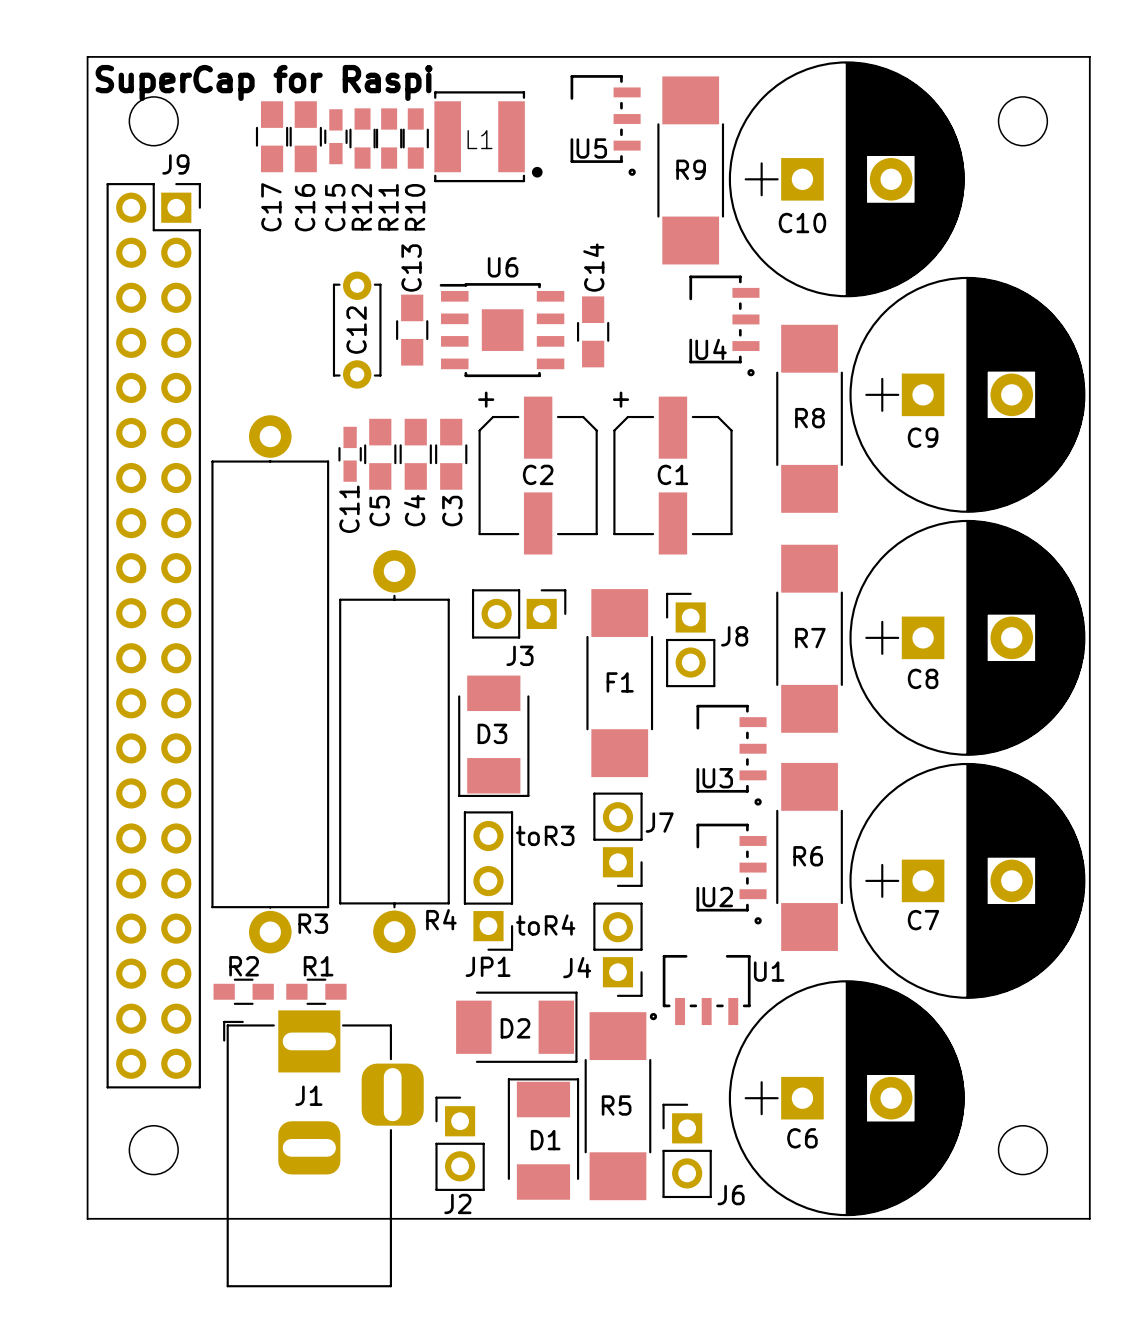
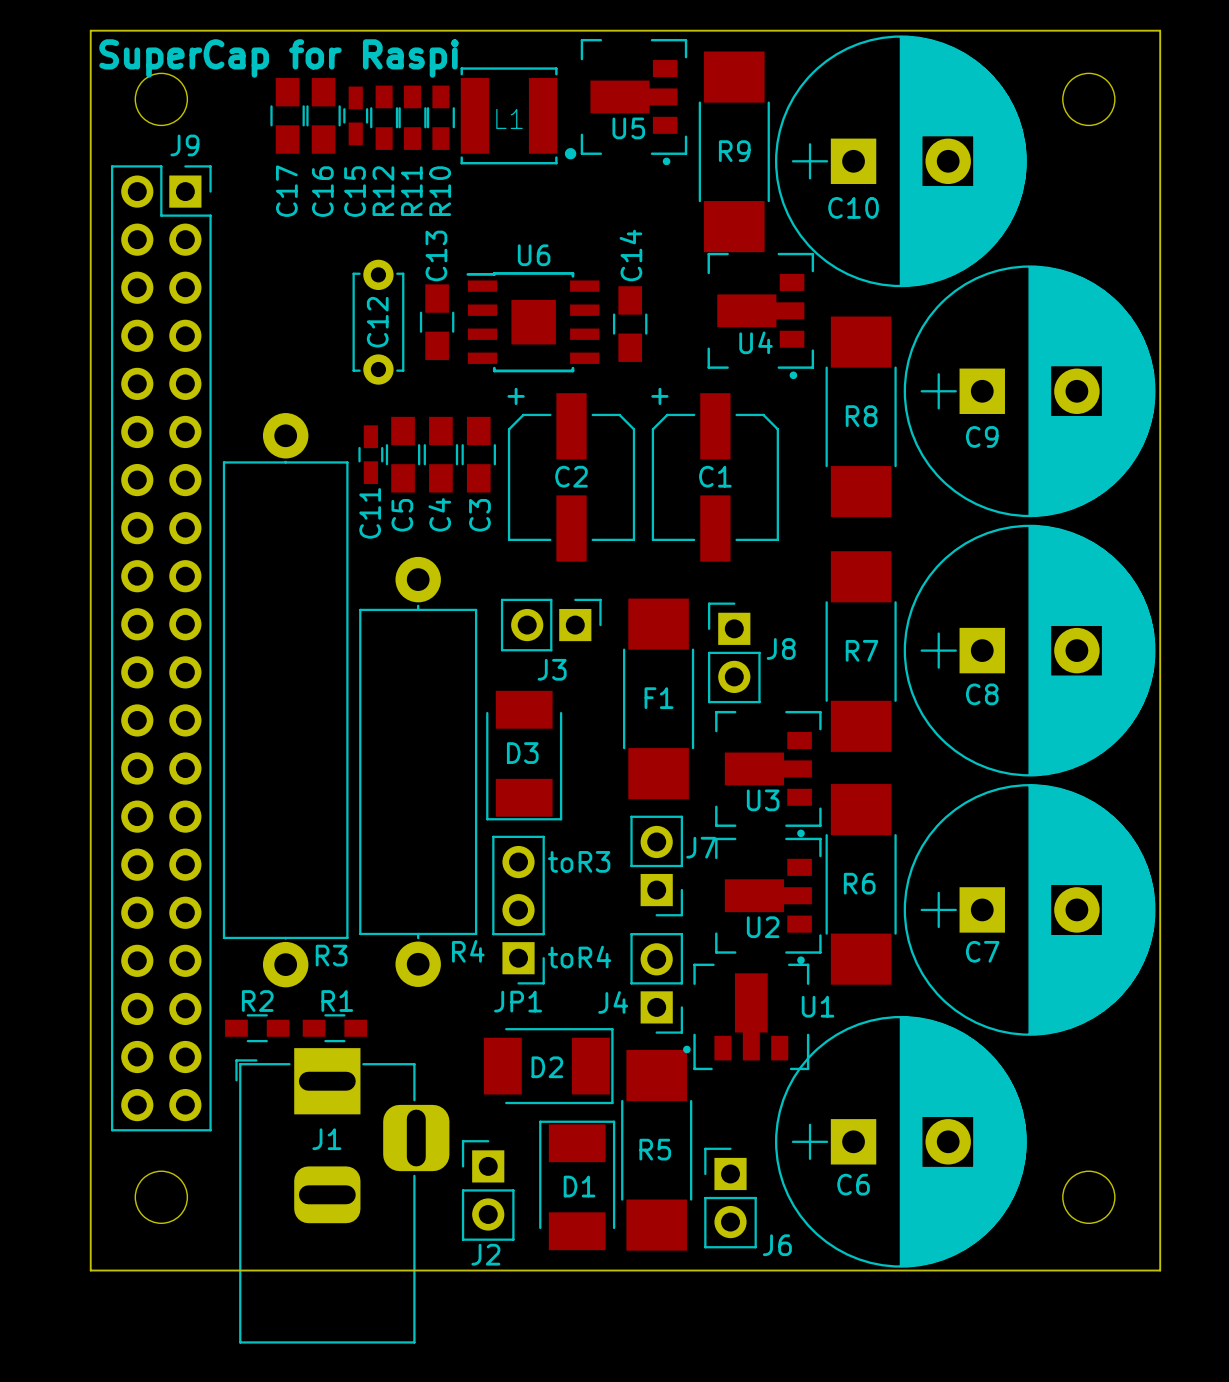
U5 footprint: [570, 75, 641, 176] -> [580, 38, 688, 166]
U4 footprint: [689, 275, 760, 377] -> [707, 252, 815, 380]
U3 footprint: [696, 704, 767, 806] -> [715, 710, 822, 838]
U2 footprint: [696, 823, 767, 925] -> [715, 837, 822, 964]
U1 footprint: [649, 954, 751, 1026] -> [683, 963, 810, 1071]

